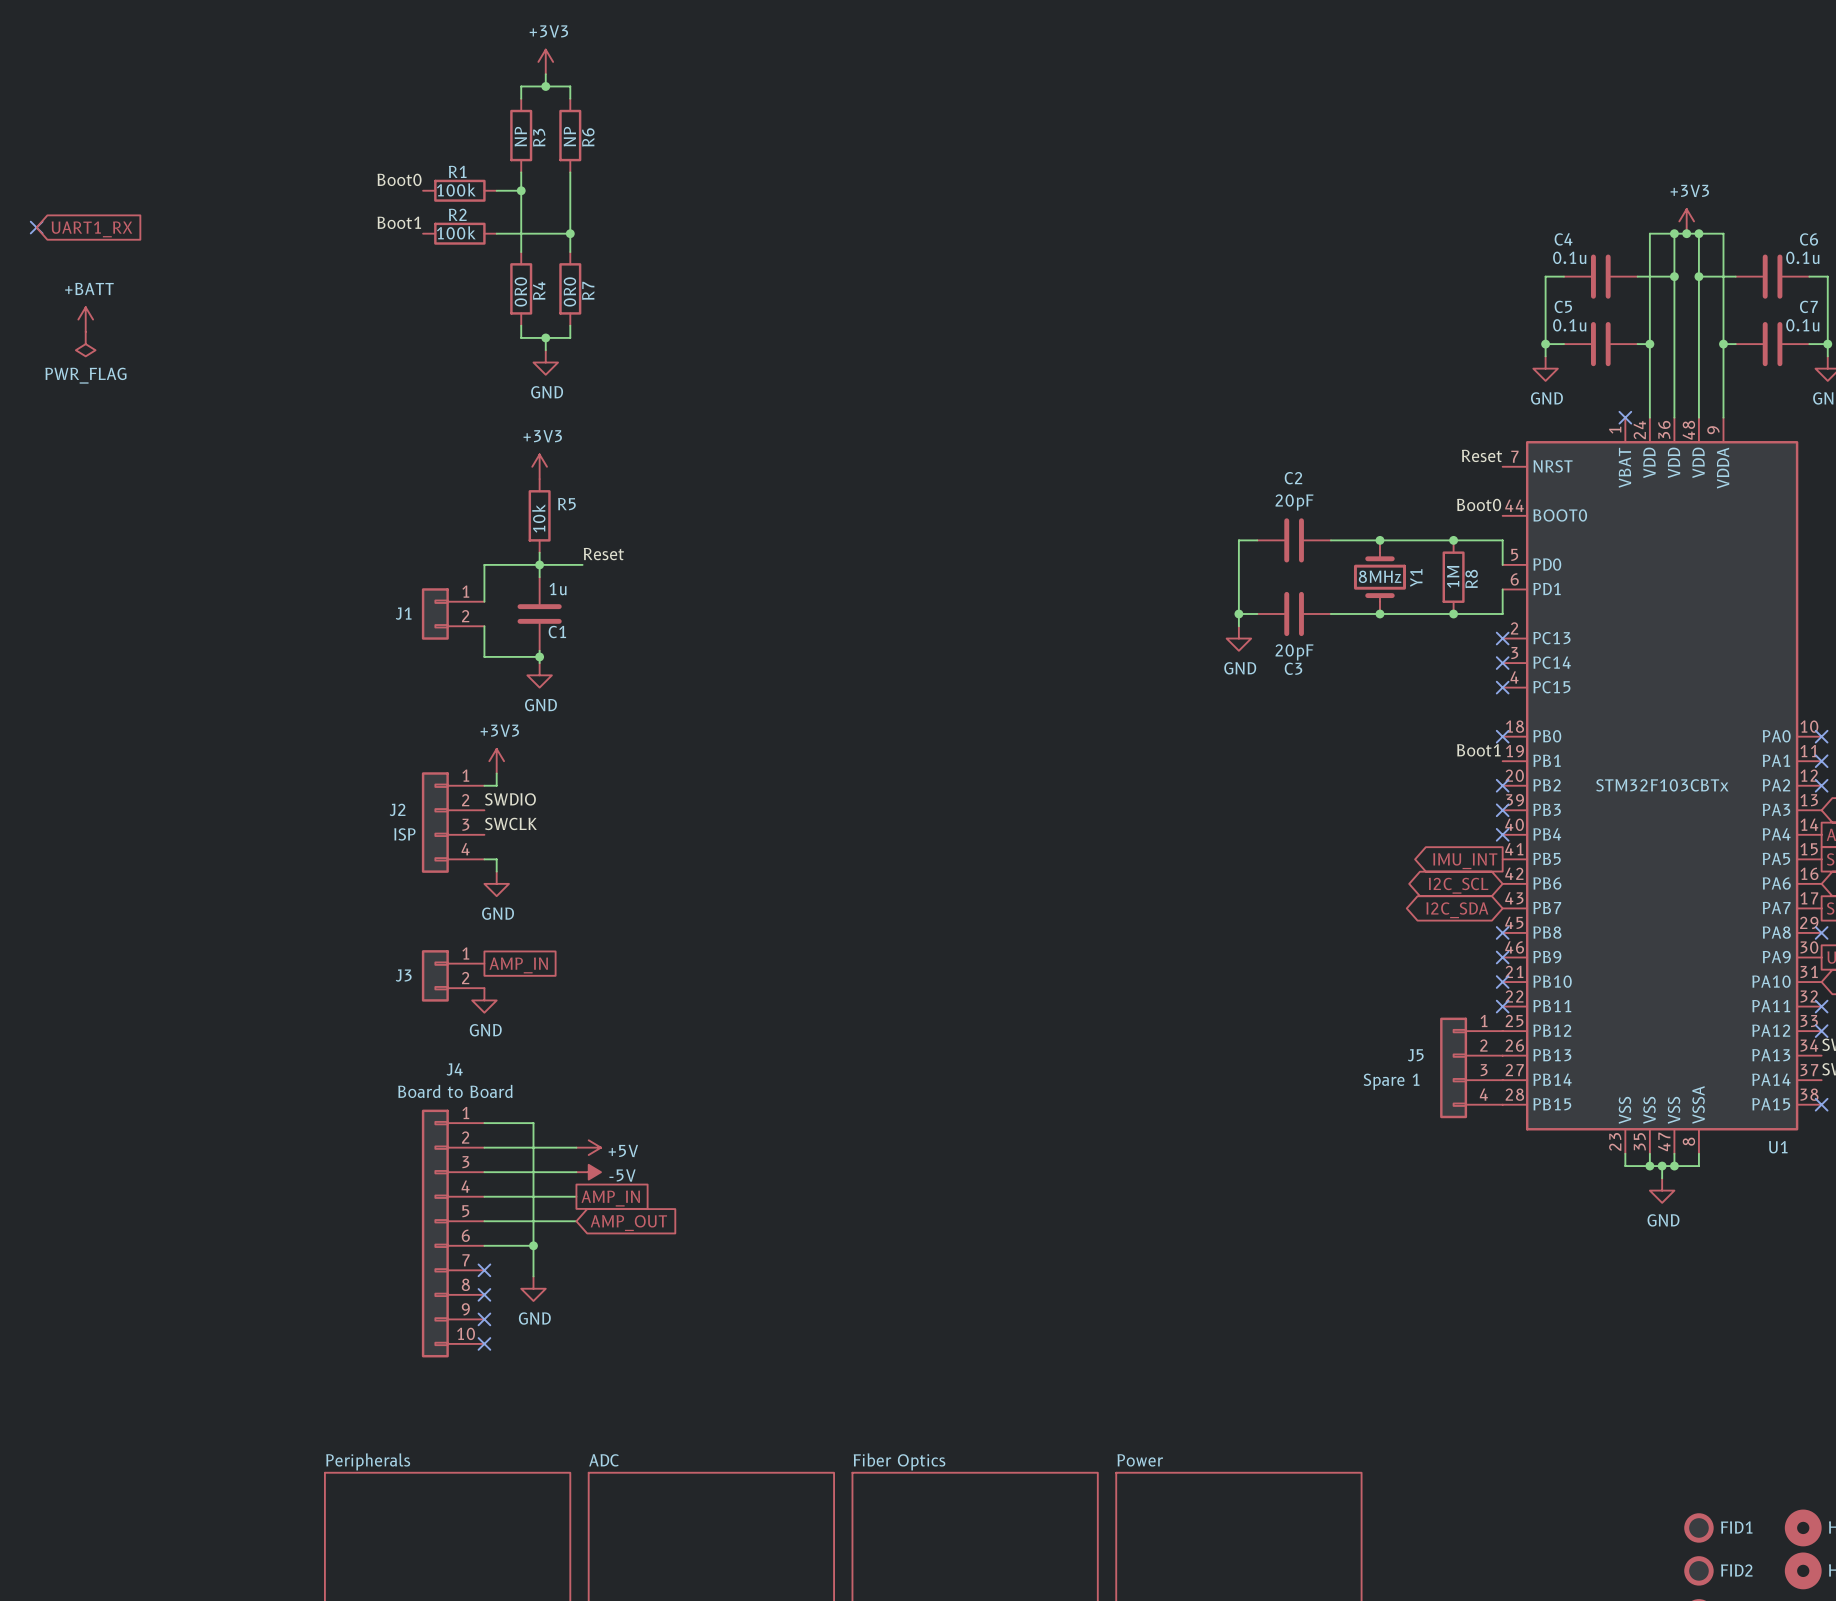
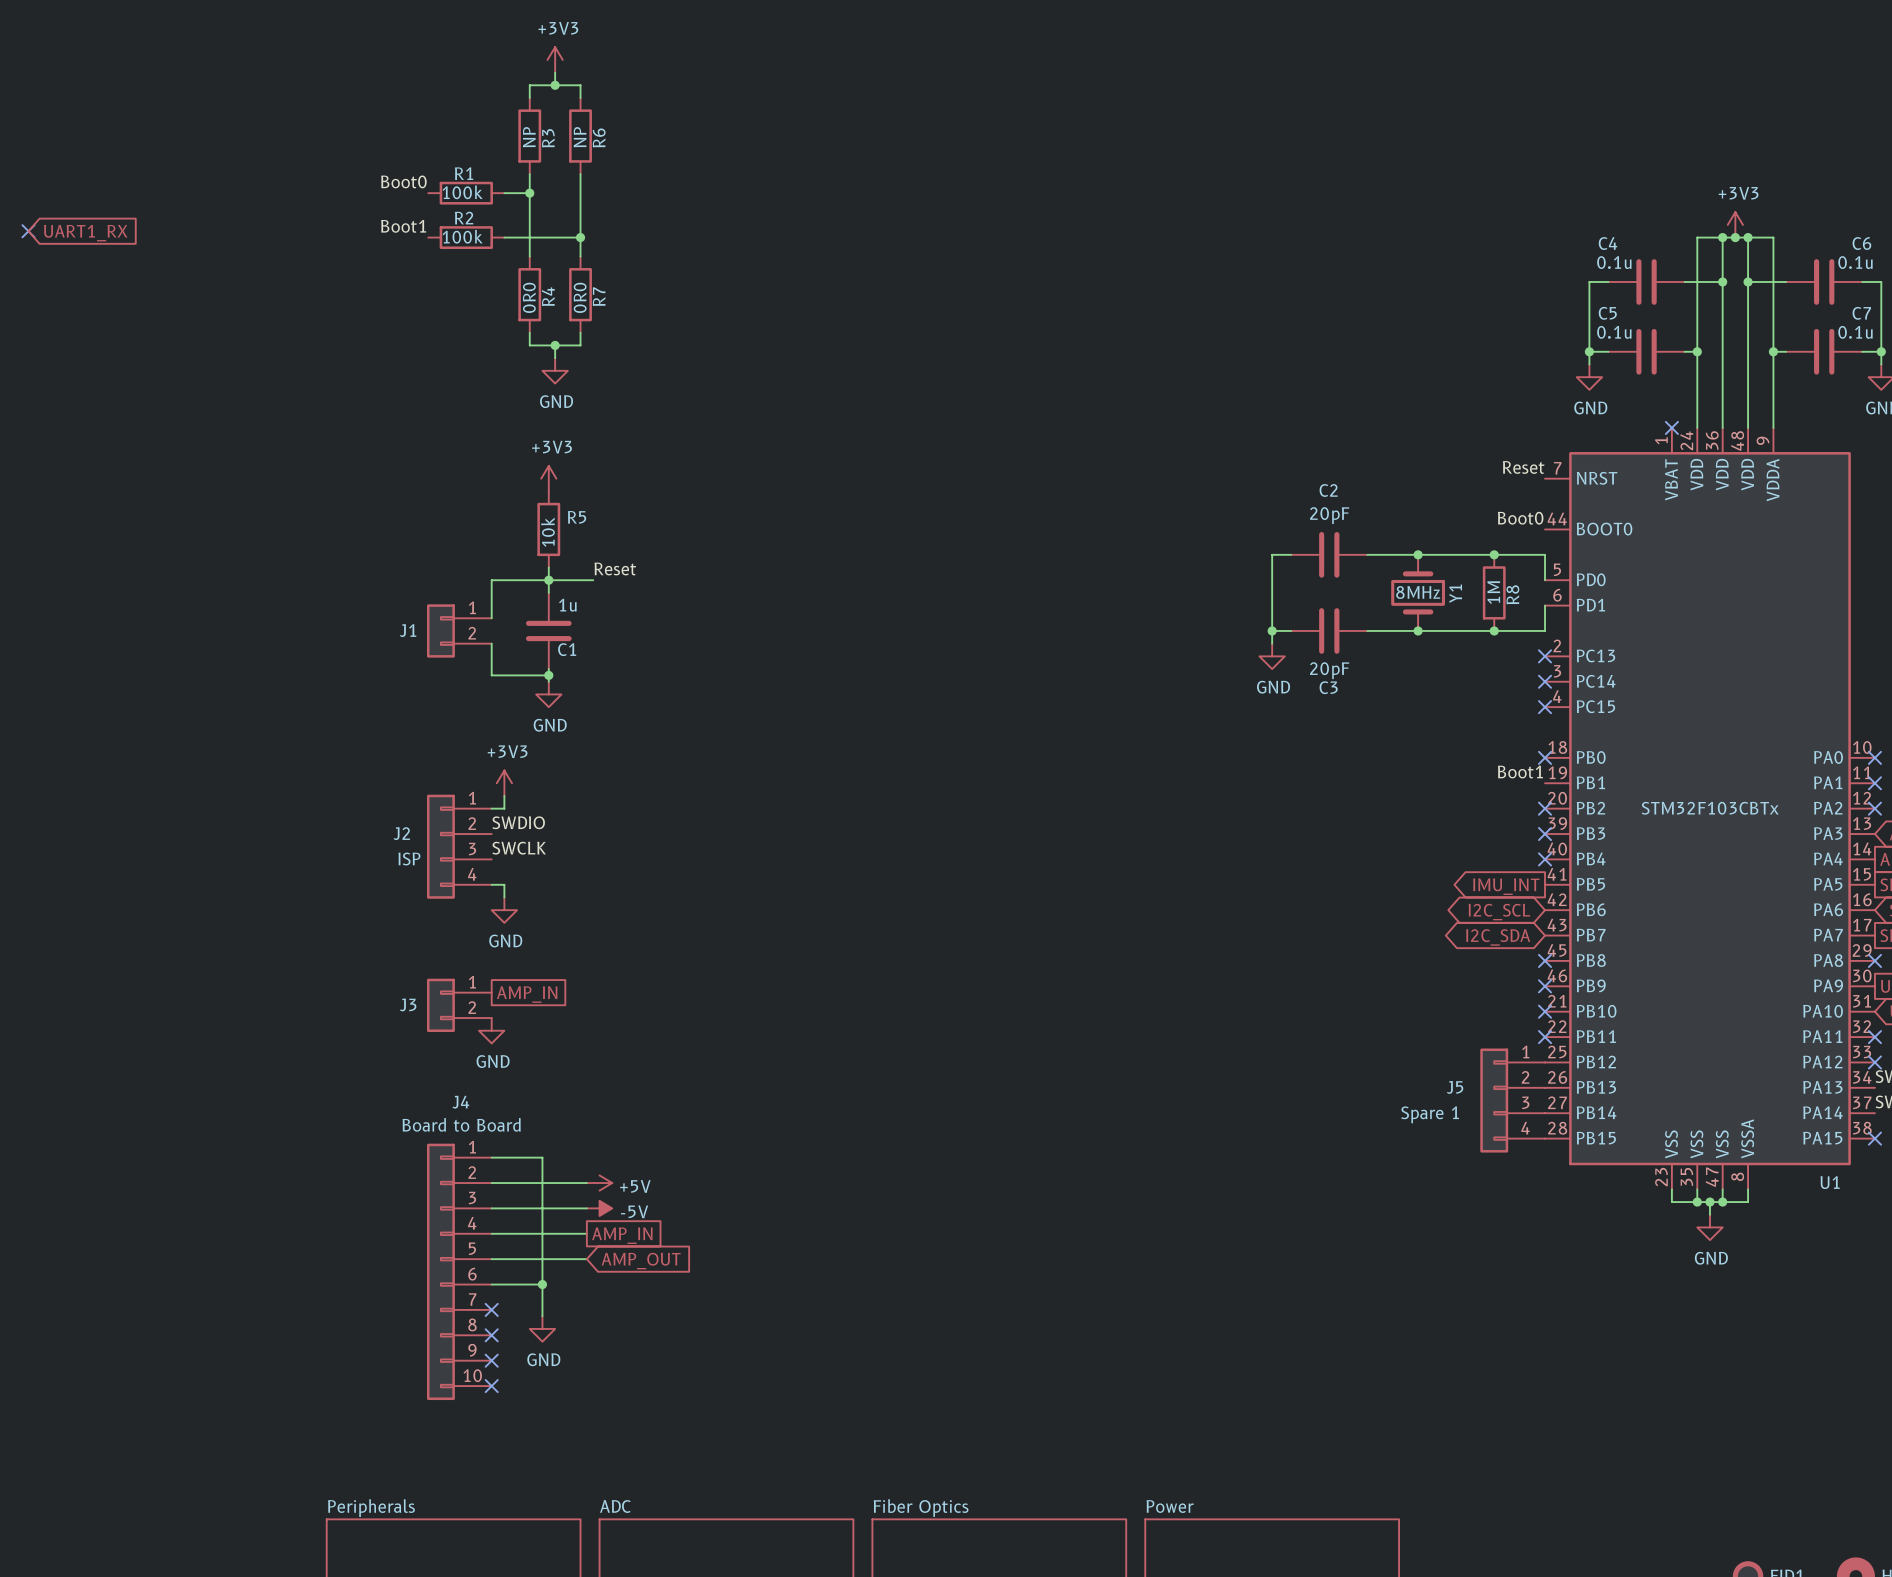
power symbol: +BATT (85, 319) -> none
power symbol: PWR_FLAG (85, 344) -> none

